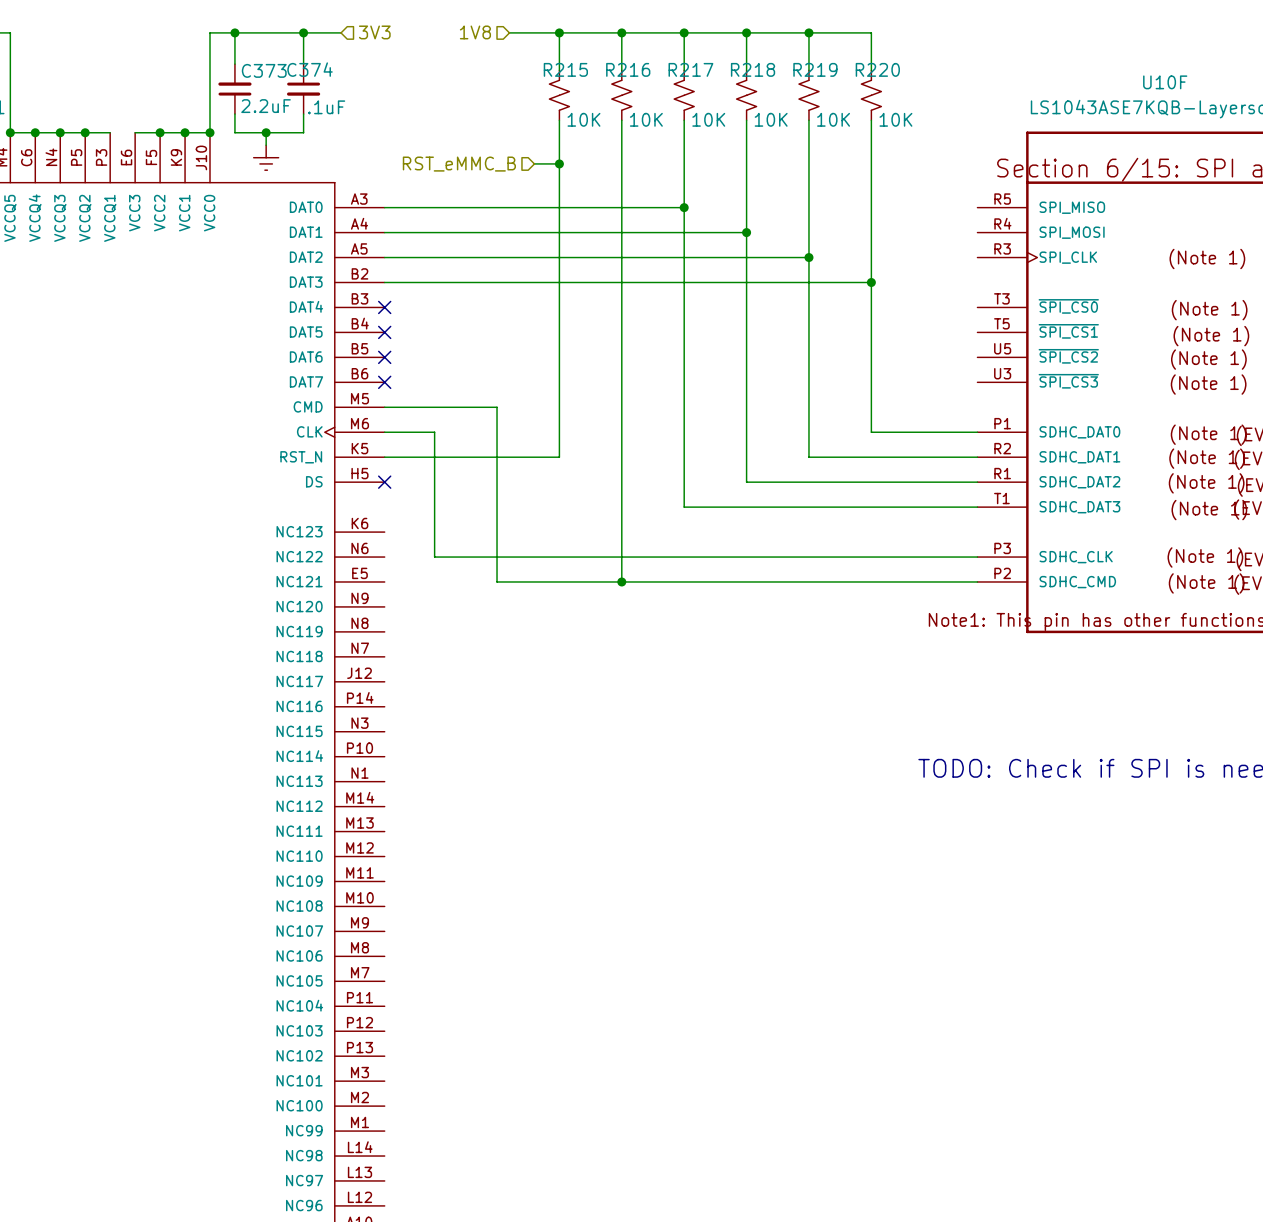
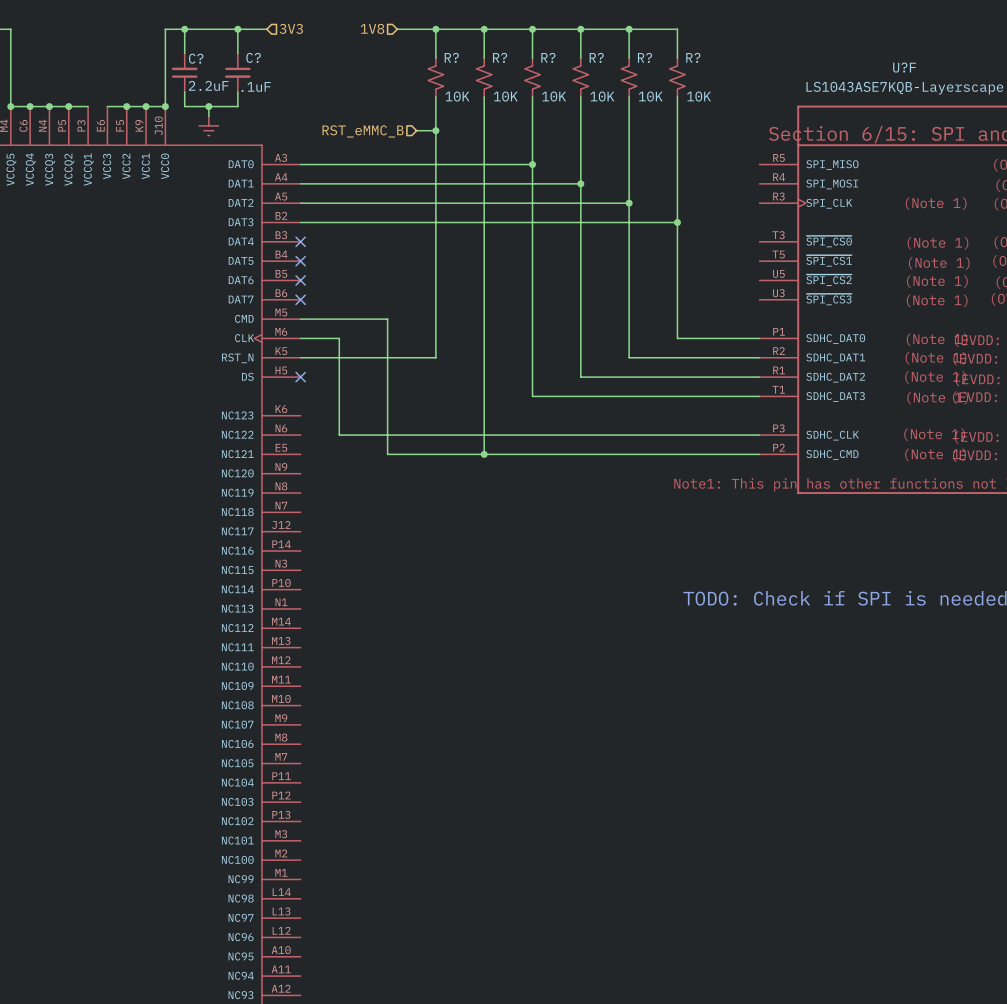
C374 name: C374 (310, 69) -> C? (253, 57)
R215 name: R215 (565, 69) -> R? (451, 57)
R216 name: R216 (628, 69) -> R? (500, 57)
R217 name: R217 (690, 69) -> R? (548, 57)
R218 name: R218 (753, 69) -> R? (596, 57)
R219 name: R219 (815, 69) -> R? (644, 57)
R220 name: R220 (877, 69) -> R? (693, 57)
C373 name: C373 (264, 70) -> C? (196, 58)
U10F name: U10F (1165, 82) -> U?F (904, 67)

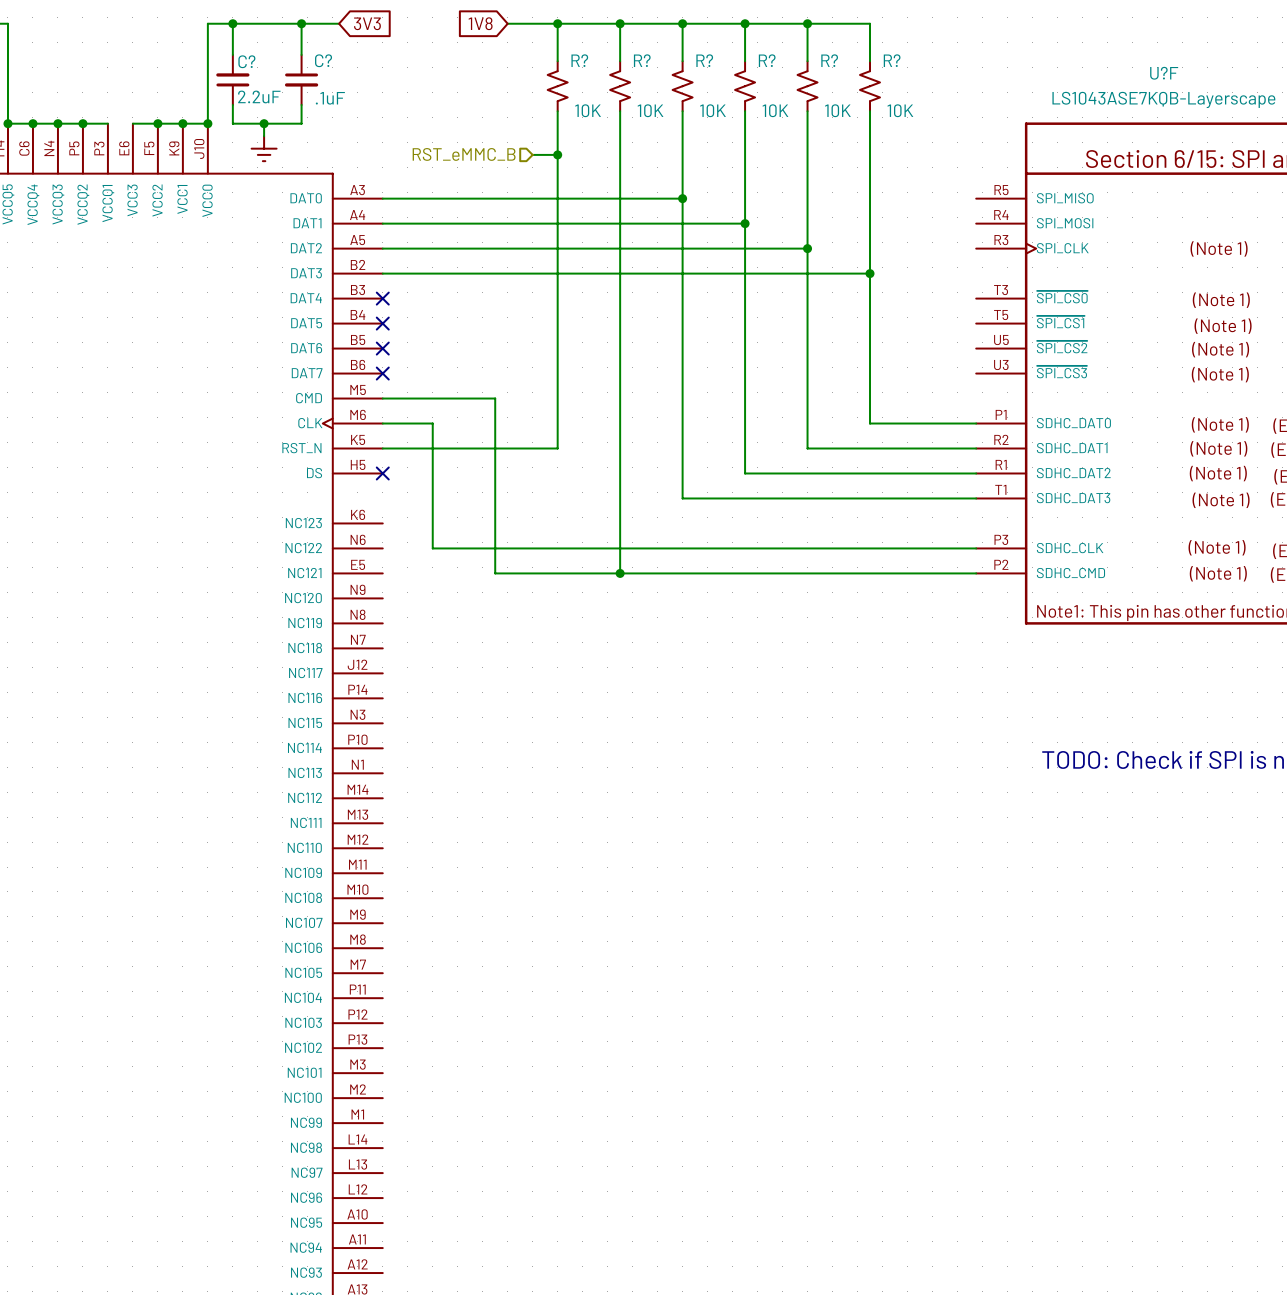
hierarchical label: 3V3 (291, 28) -> none
hierarchical label: 1V8 (372, 28) -> none
global label: none -> 3V3 (367, 23)
global label: none -> 1V8 (480, 23)

